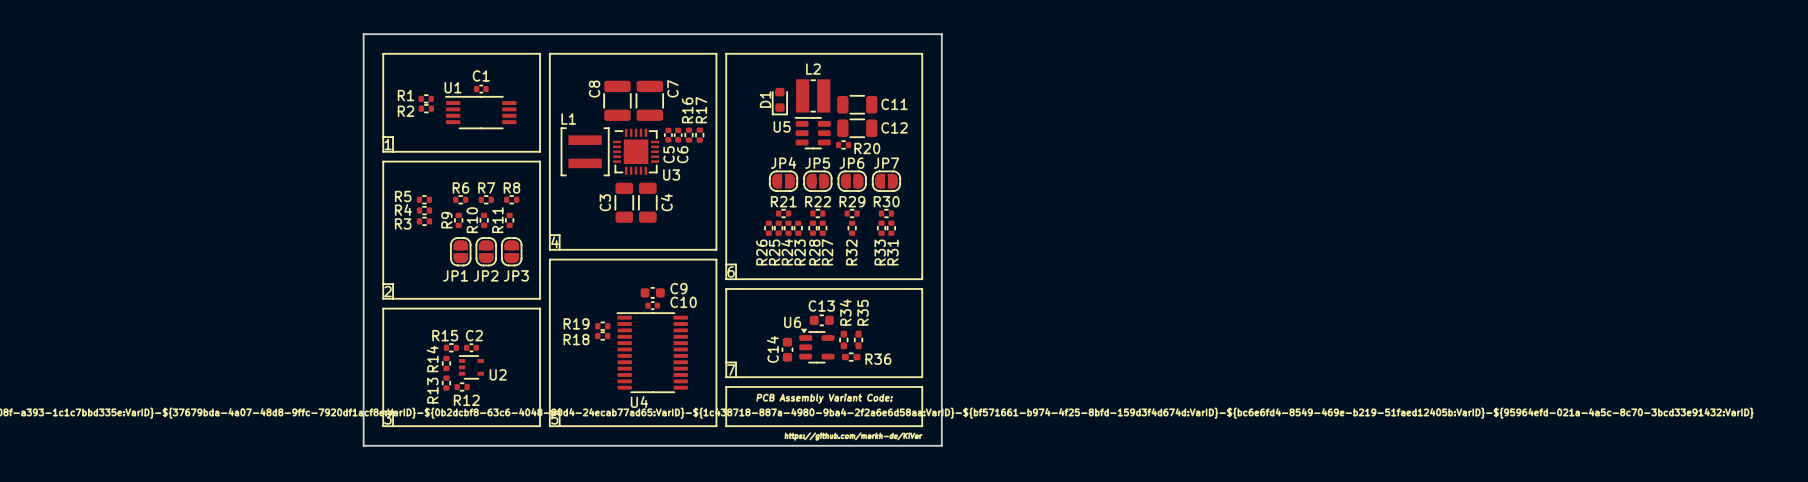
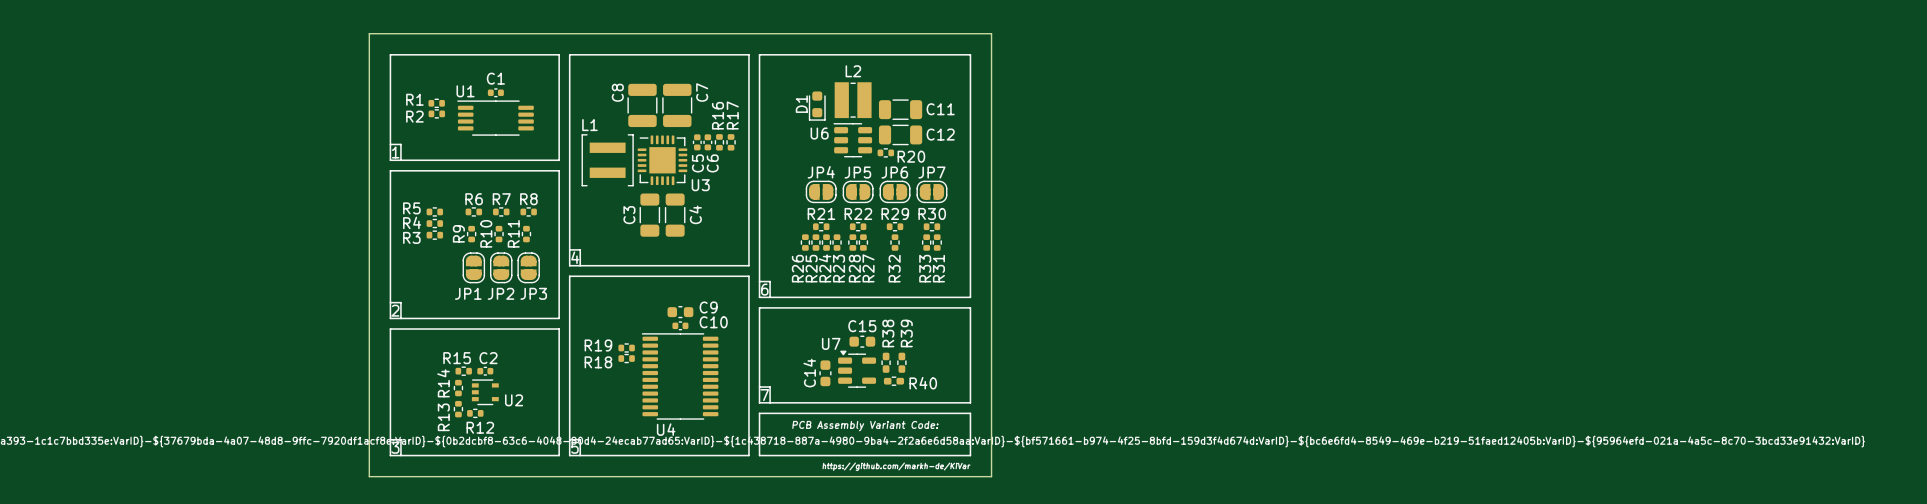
U5 name: U5 (782, 126) -> U6 (819, 133)
C13 name: C13 (821, 305) -> C15 (862, 326)
R34 name: R34 (845, 312) -> R38 (888, 333)
R35 name: R35 (863, 312) -> R39 (906, 333)
U6 name: U6 (792, 322) -> U7 (831, 343)
R36 name: R36 (878, 359) -> R40 (923, 383)

